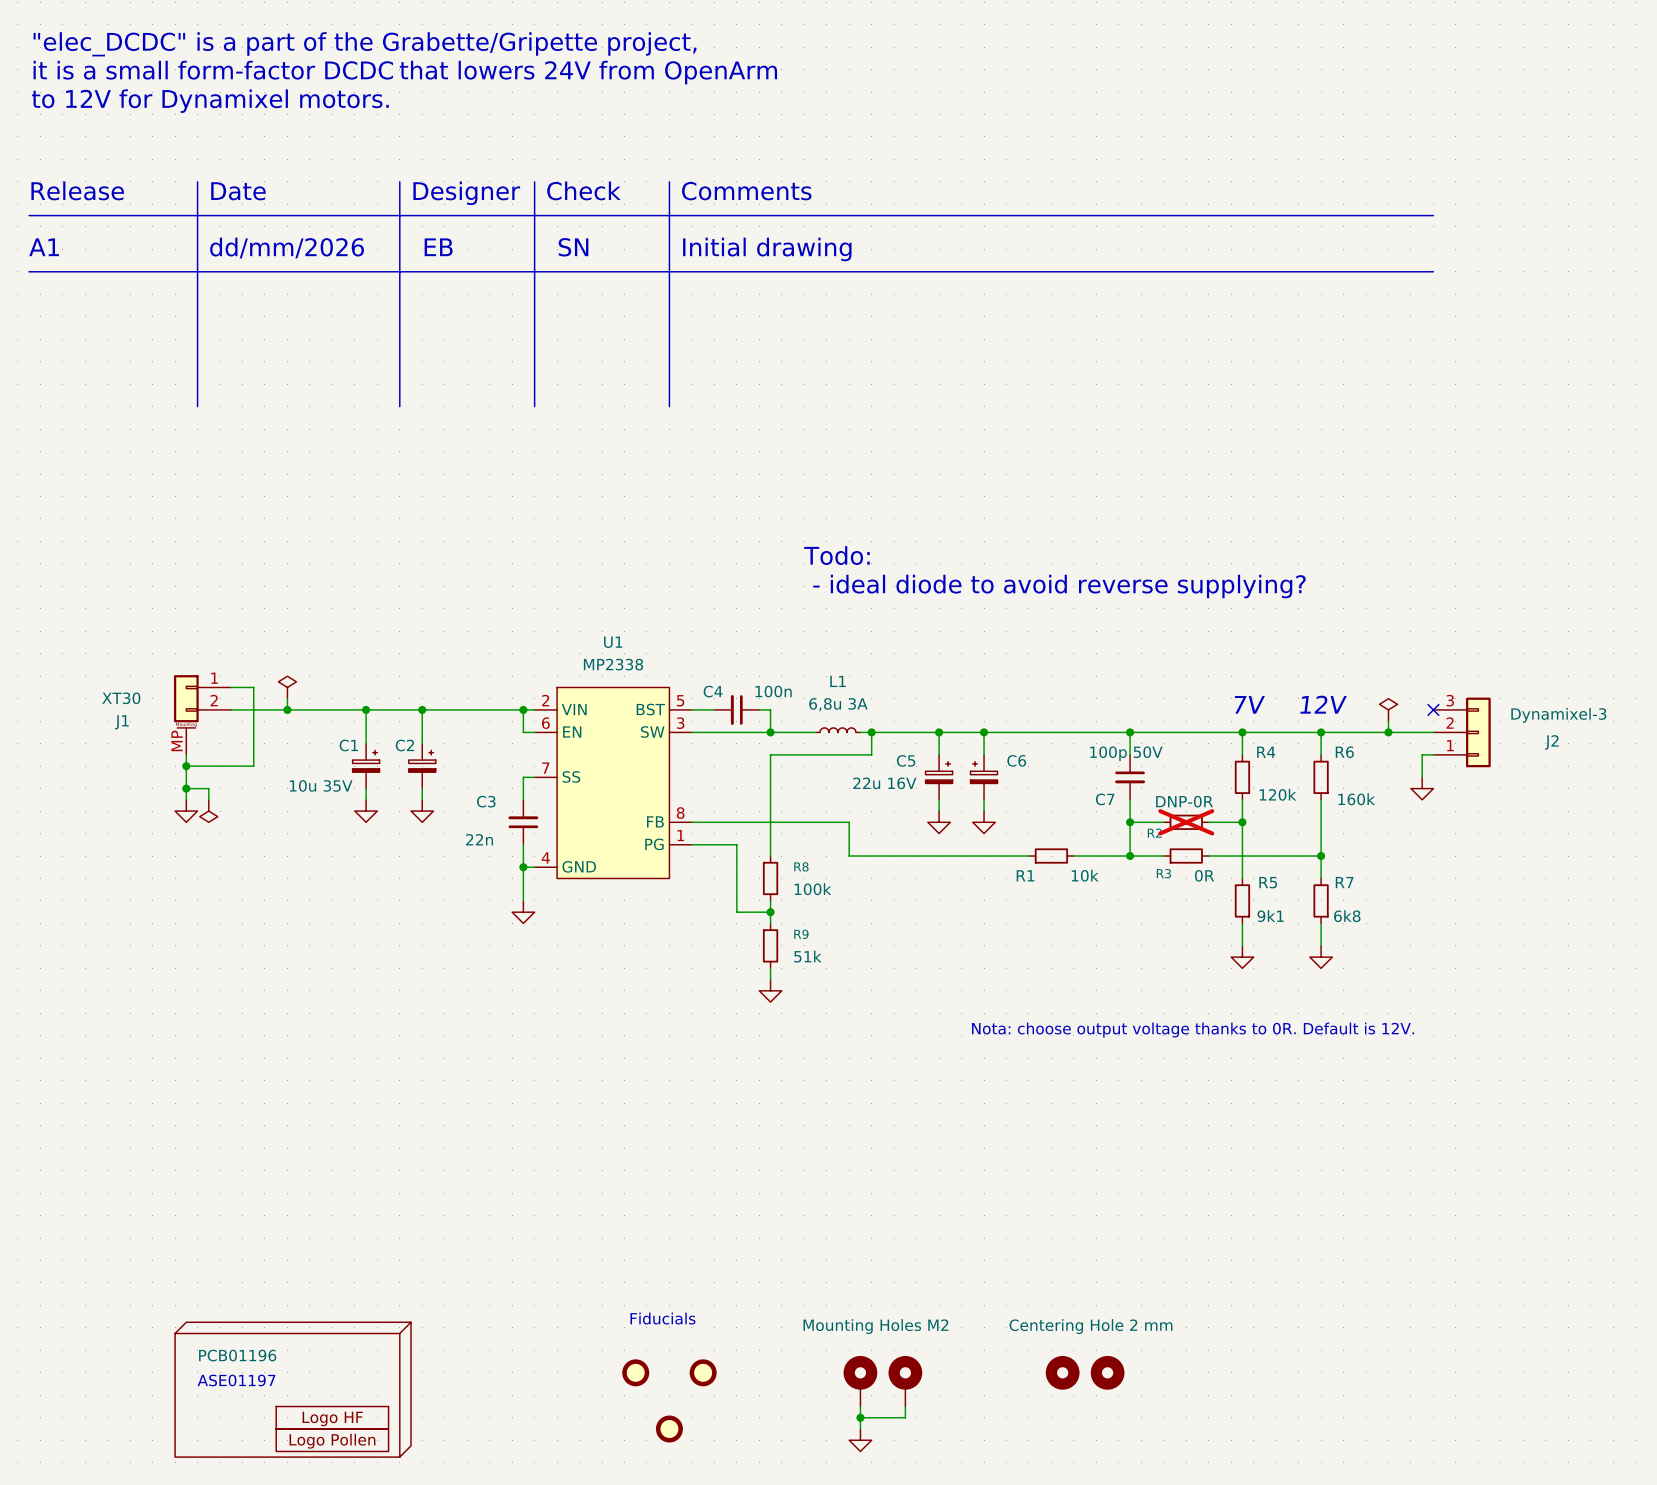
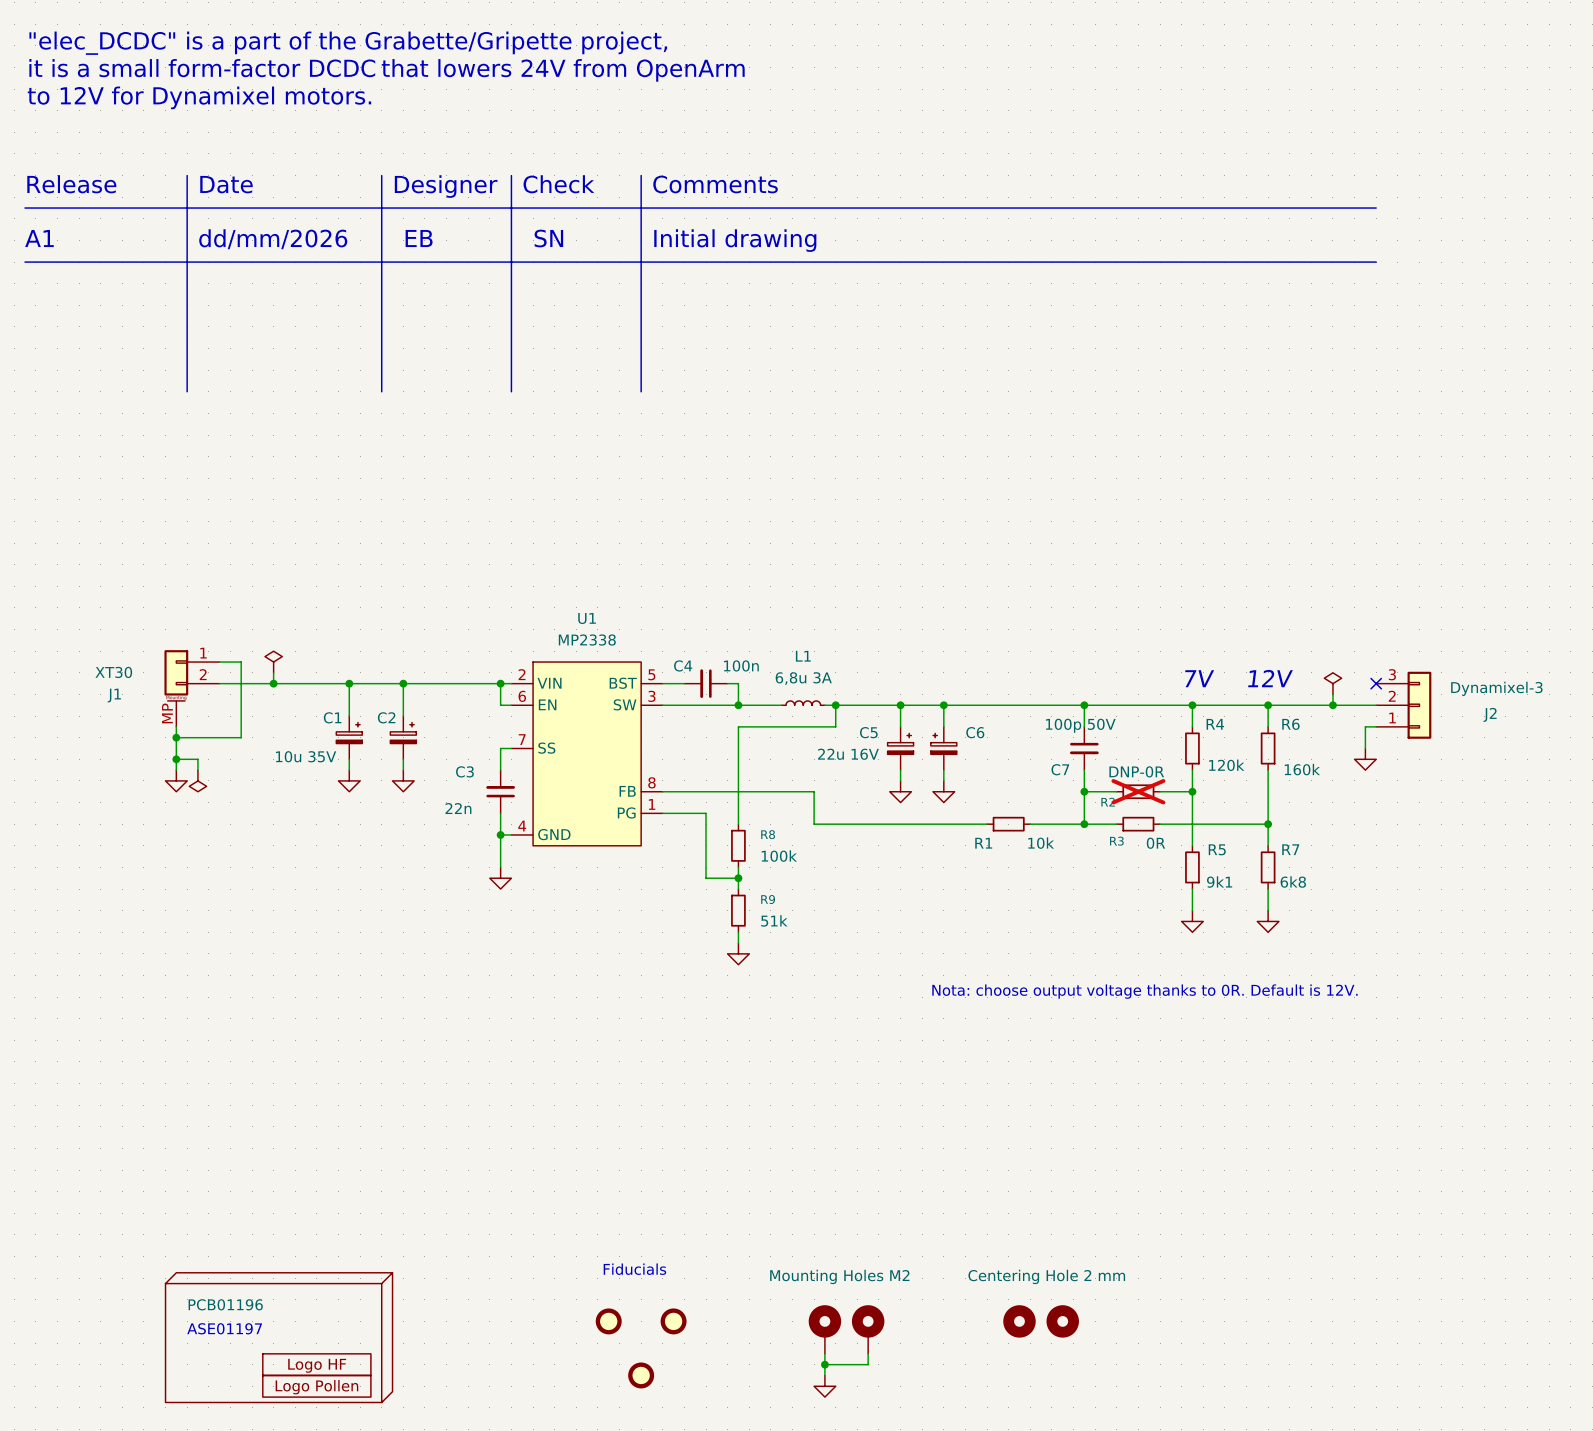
text: Todo: (836, 555) -> none
text: - ideal diode to avoid reverse supplying? (1059, 586) -> none

